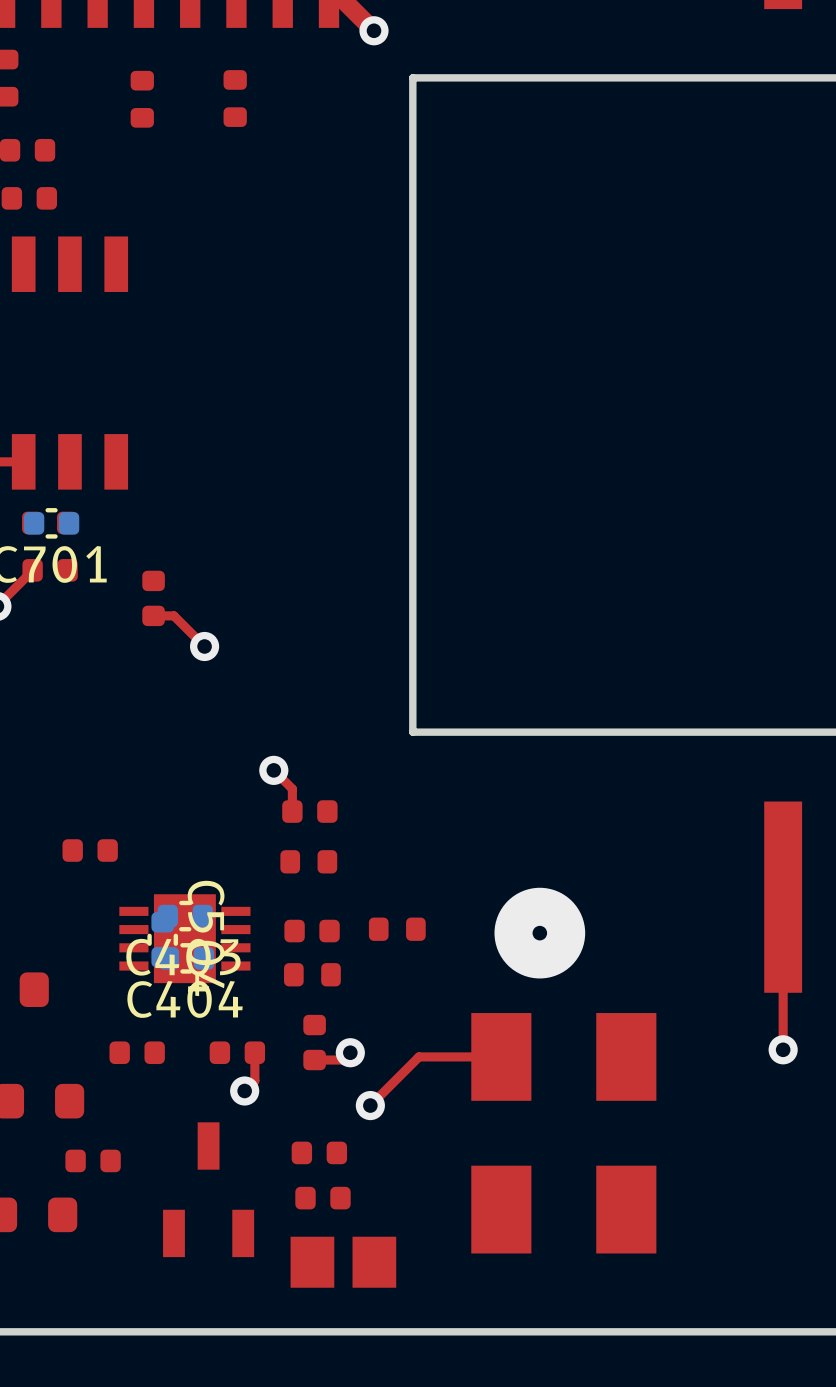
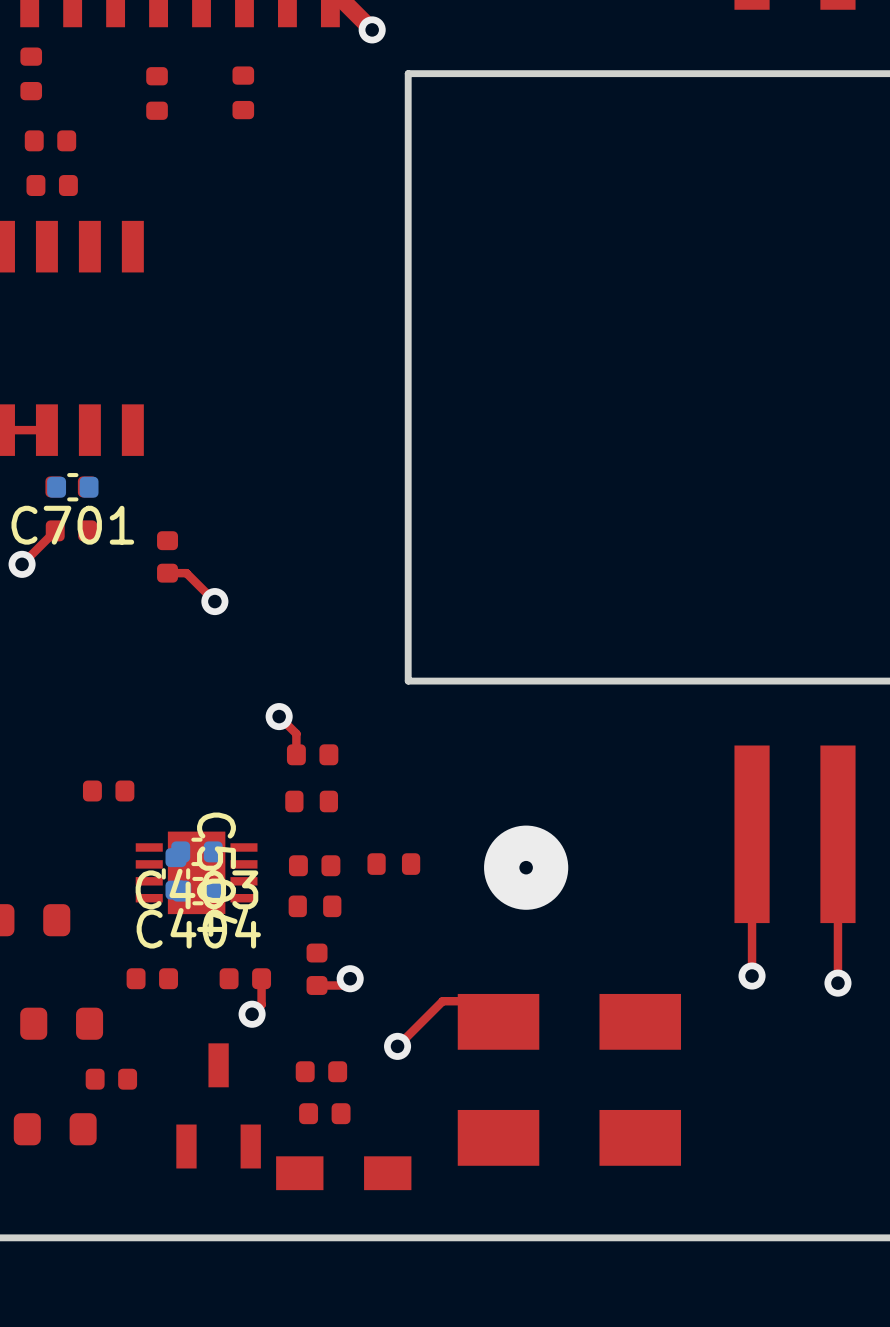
top track: (501, 1056) (419, 1056) (370, 1105) -> (519, 1001) (442, 1001) (397, 1046)
via position: (370, 1105) -> (397, 1046)
part rotation: 0° (563, 1133) -> 90° clockwise (569, 1079)
part footprint: [290, 1236, 397, 1288] -> [276, 1156, 412, 1191]

